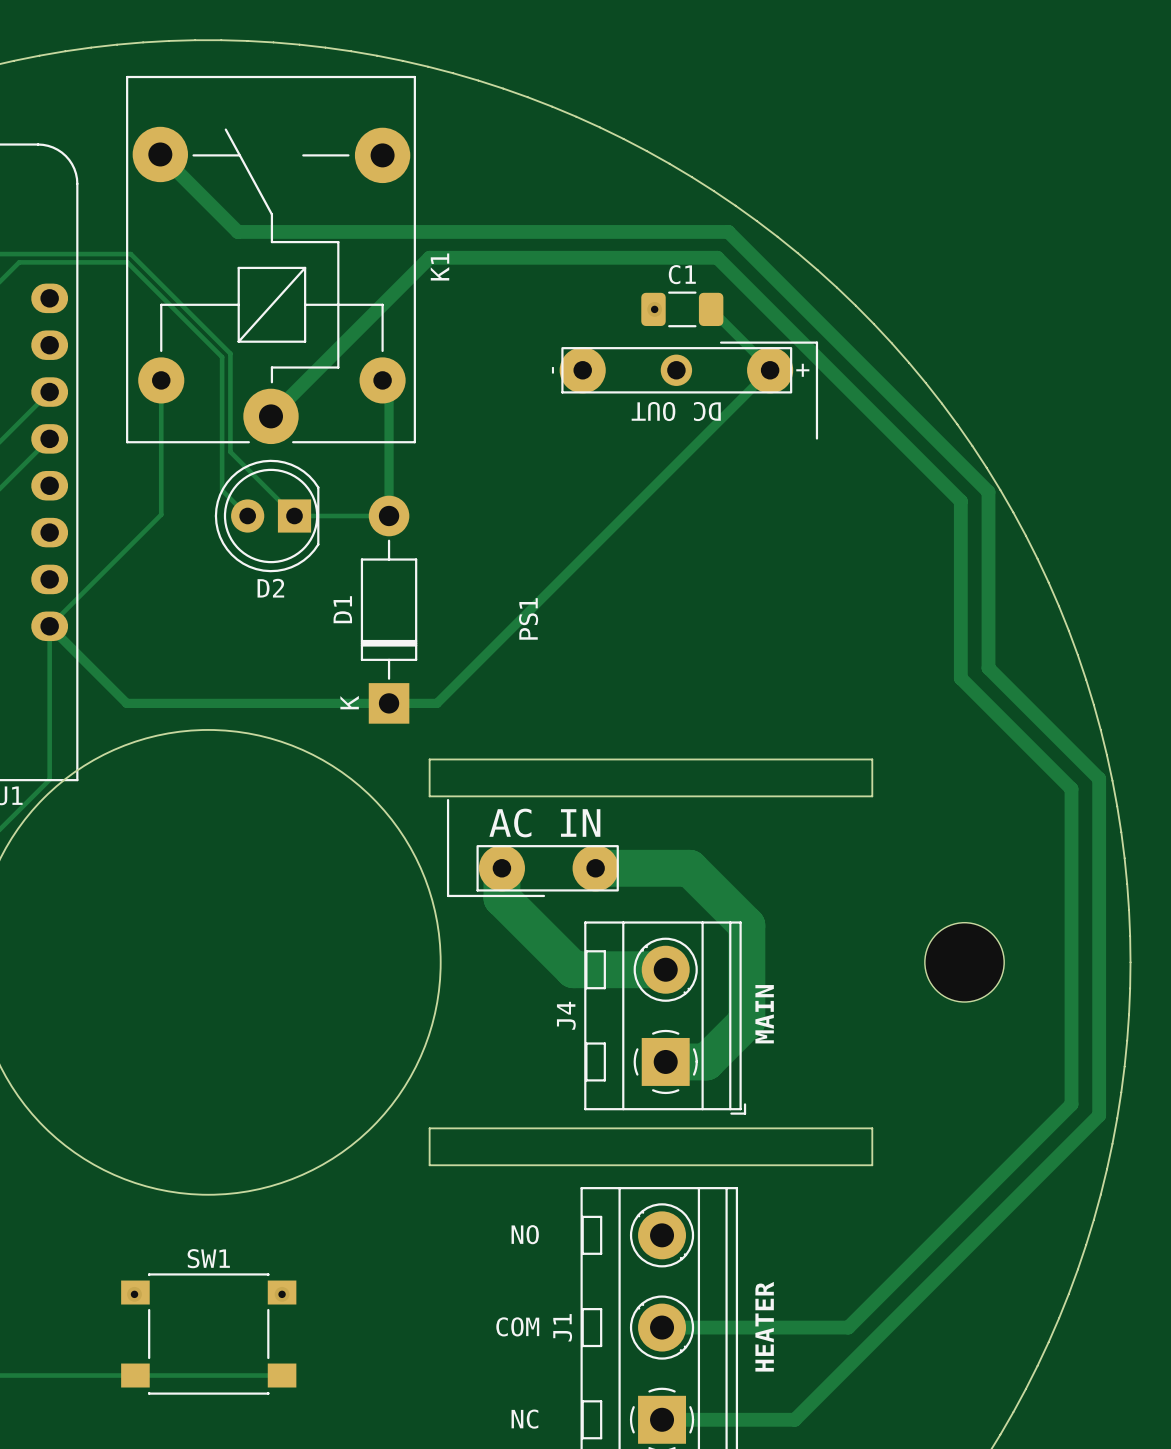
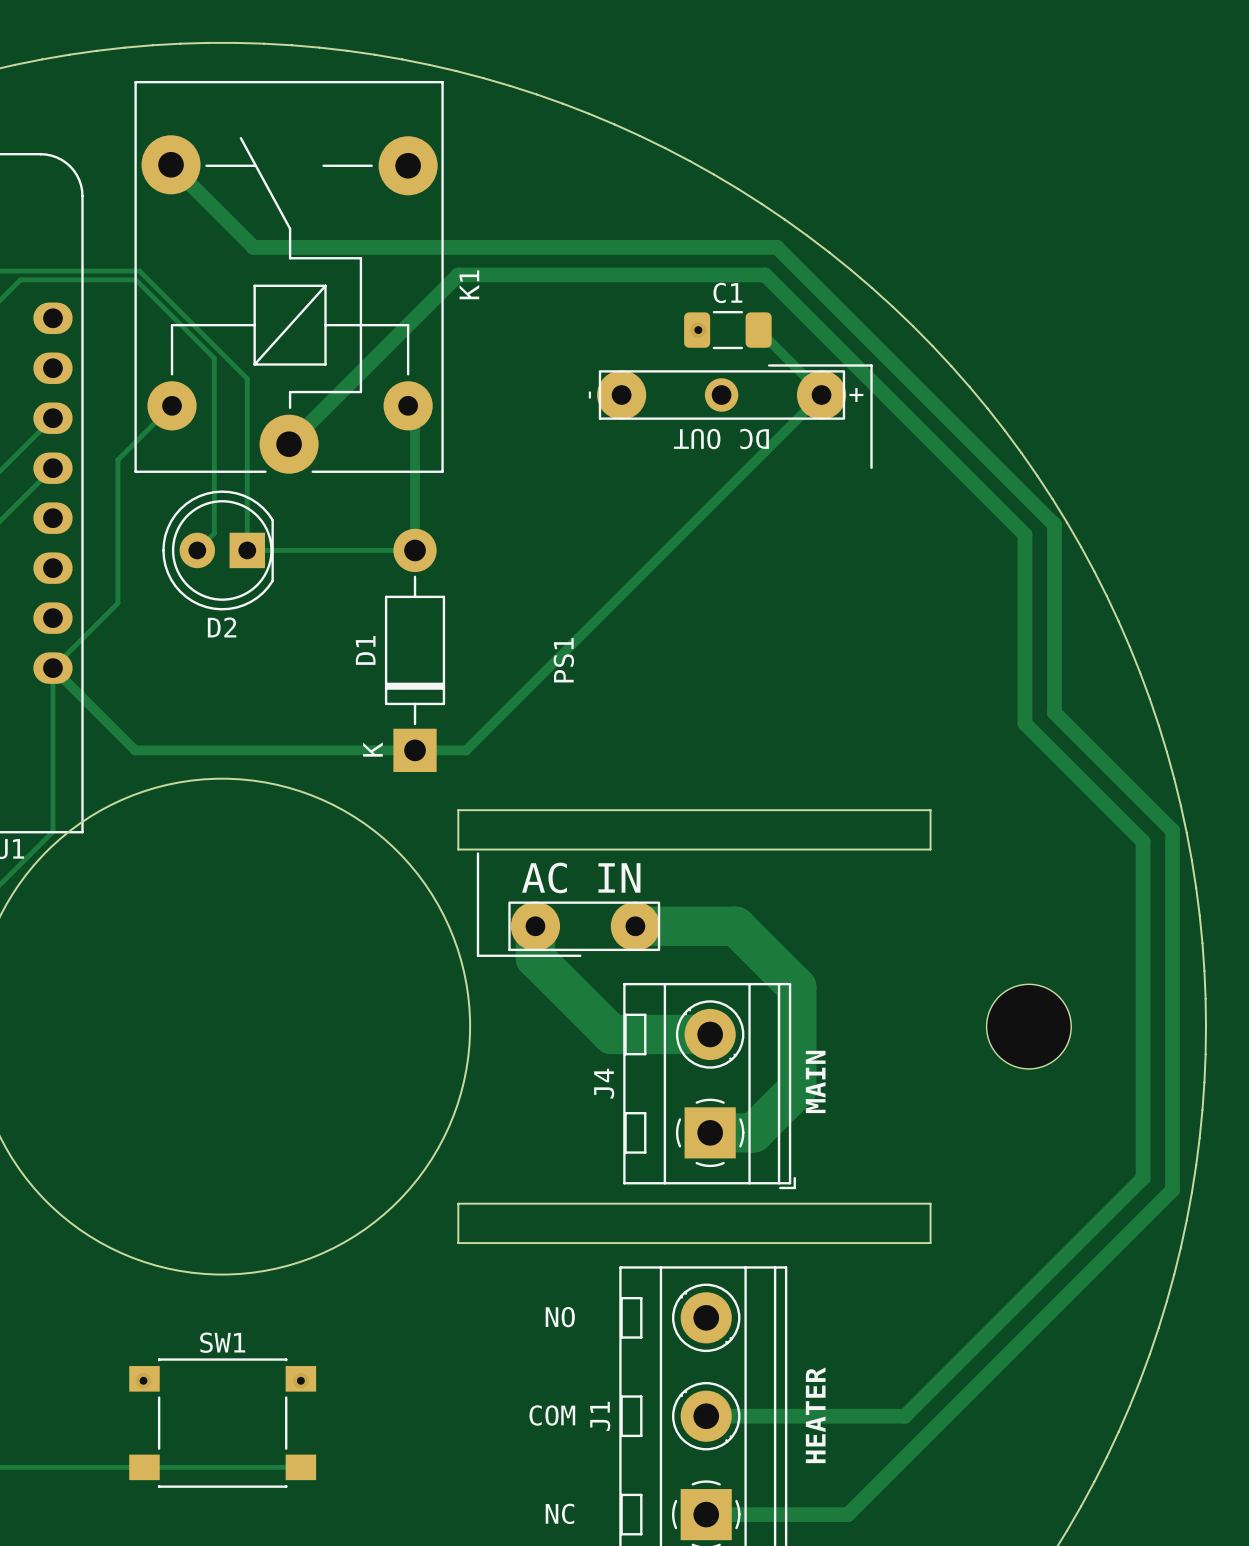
track: (200, 335) (222, 357) (222, 490) (247, 515) -> (214, 358) (214, 533) (197, 550)
track: (230, 353) (230, 451) (294, 515) -> (245, 377) (247, 550) (314, 550)
track: (161, 380) (161, 514) (110, 565) -> (172, 405) (117, 459) (117, 603)
D2 position: (267, 515) -> (218, 550)

